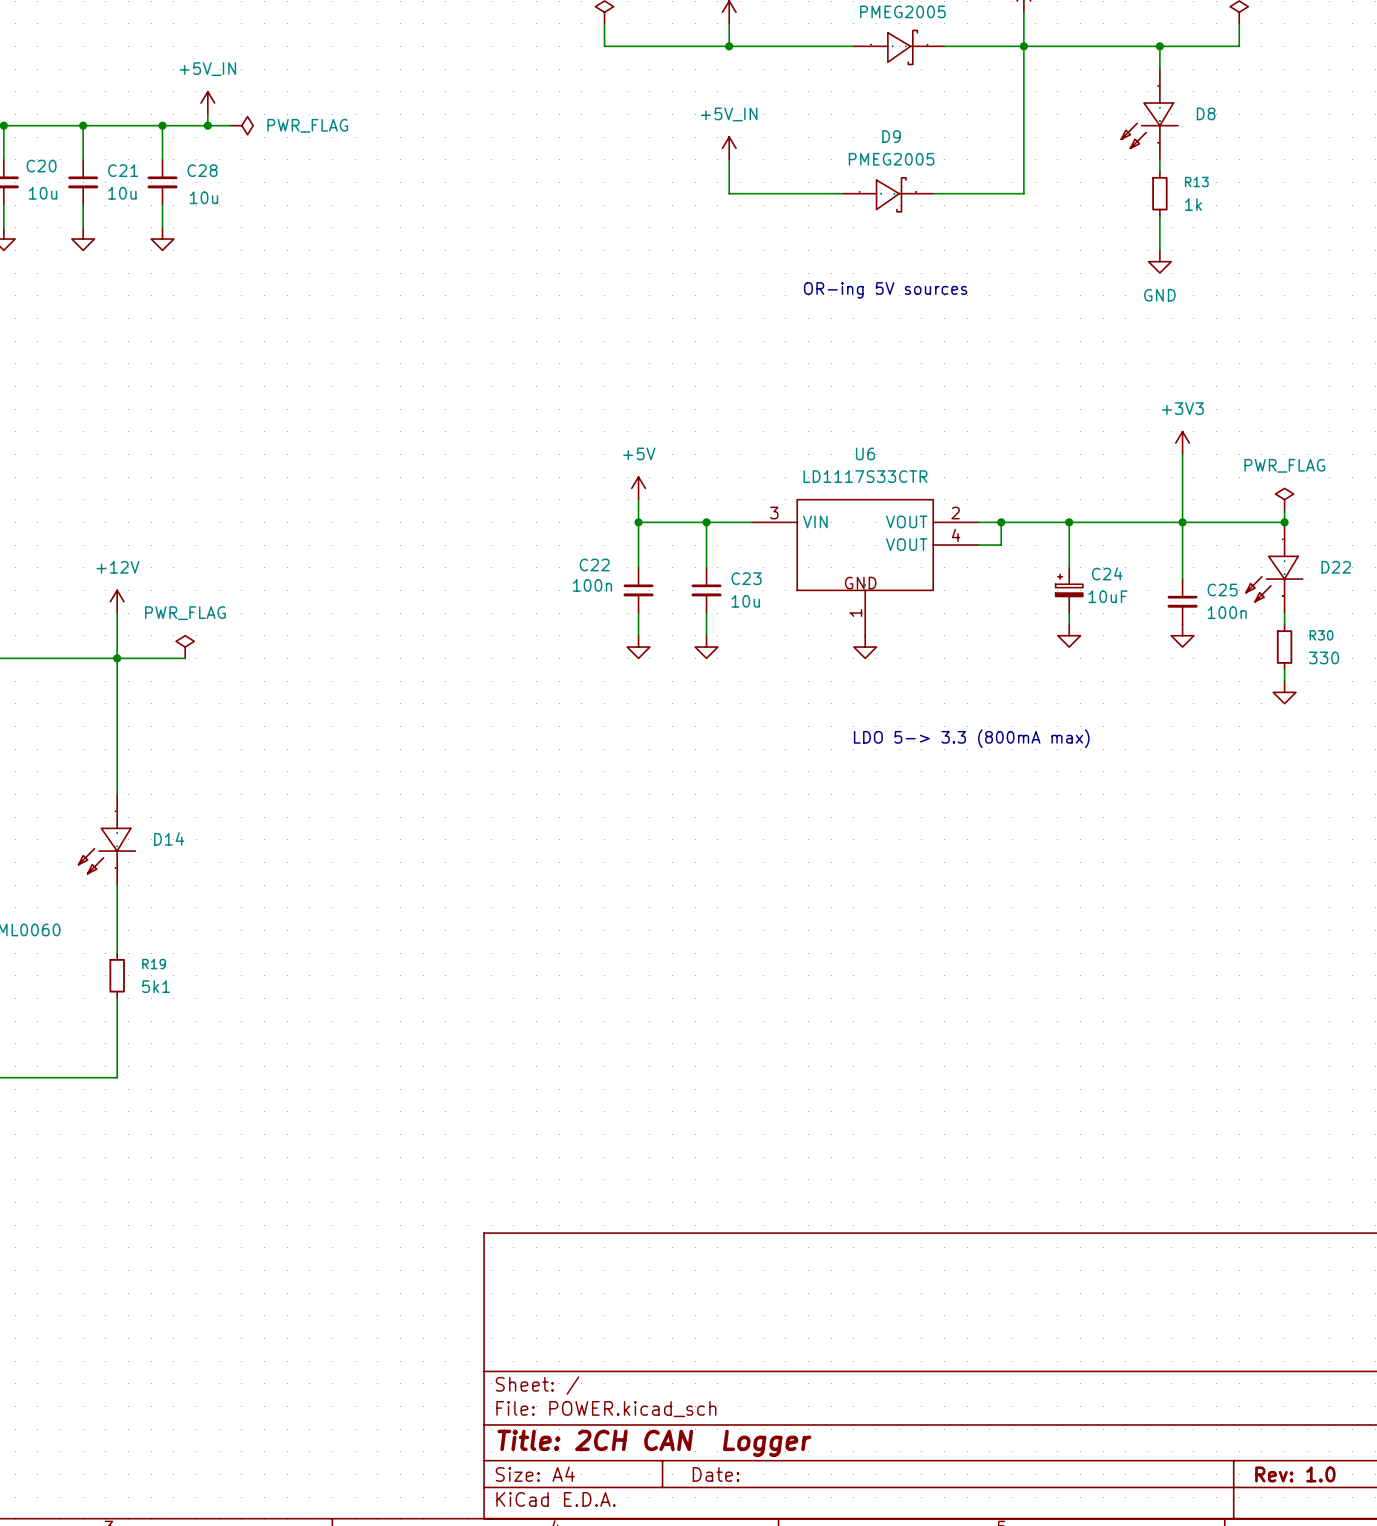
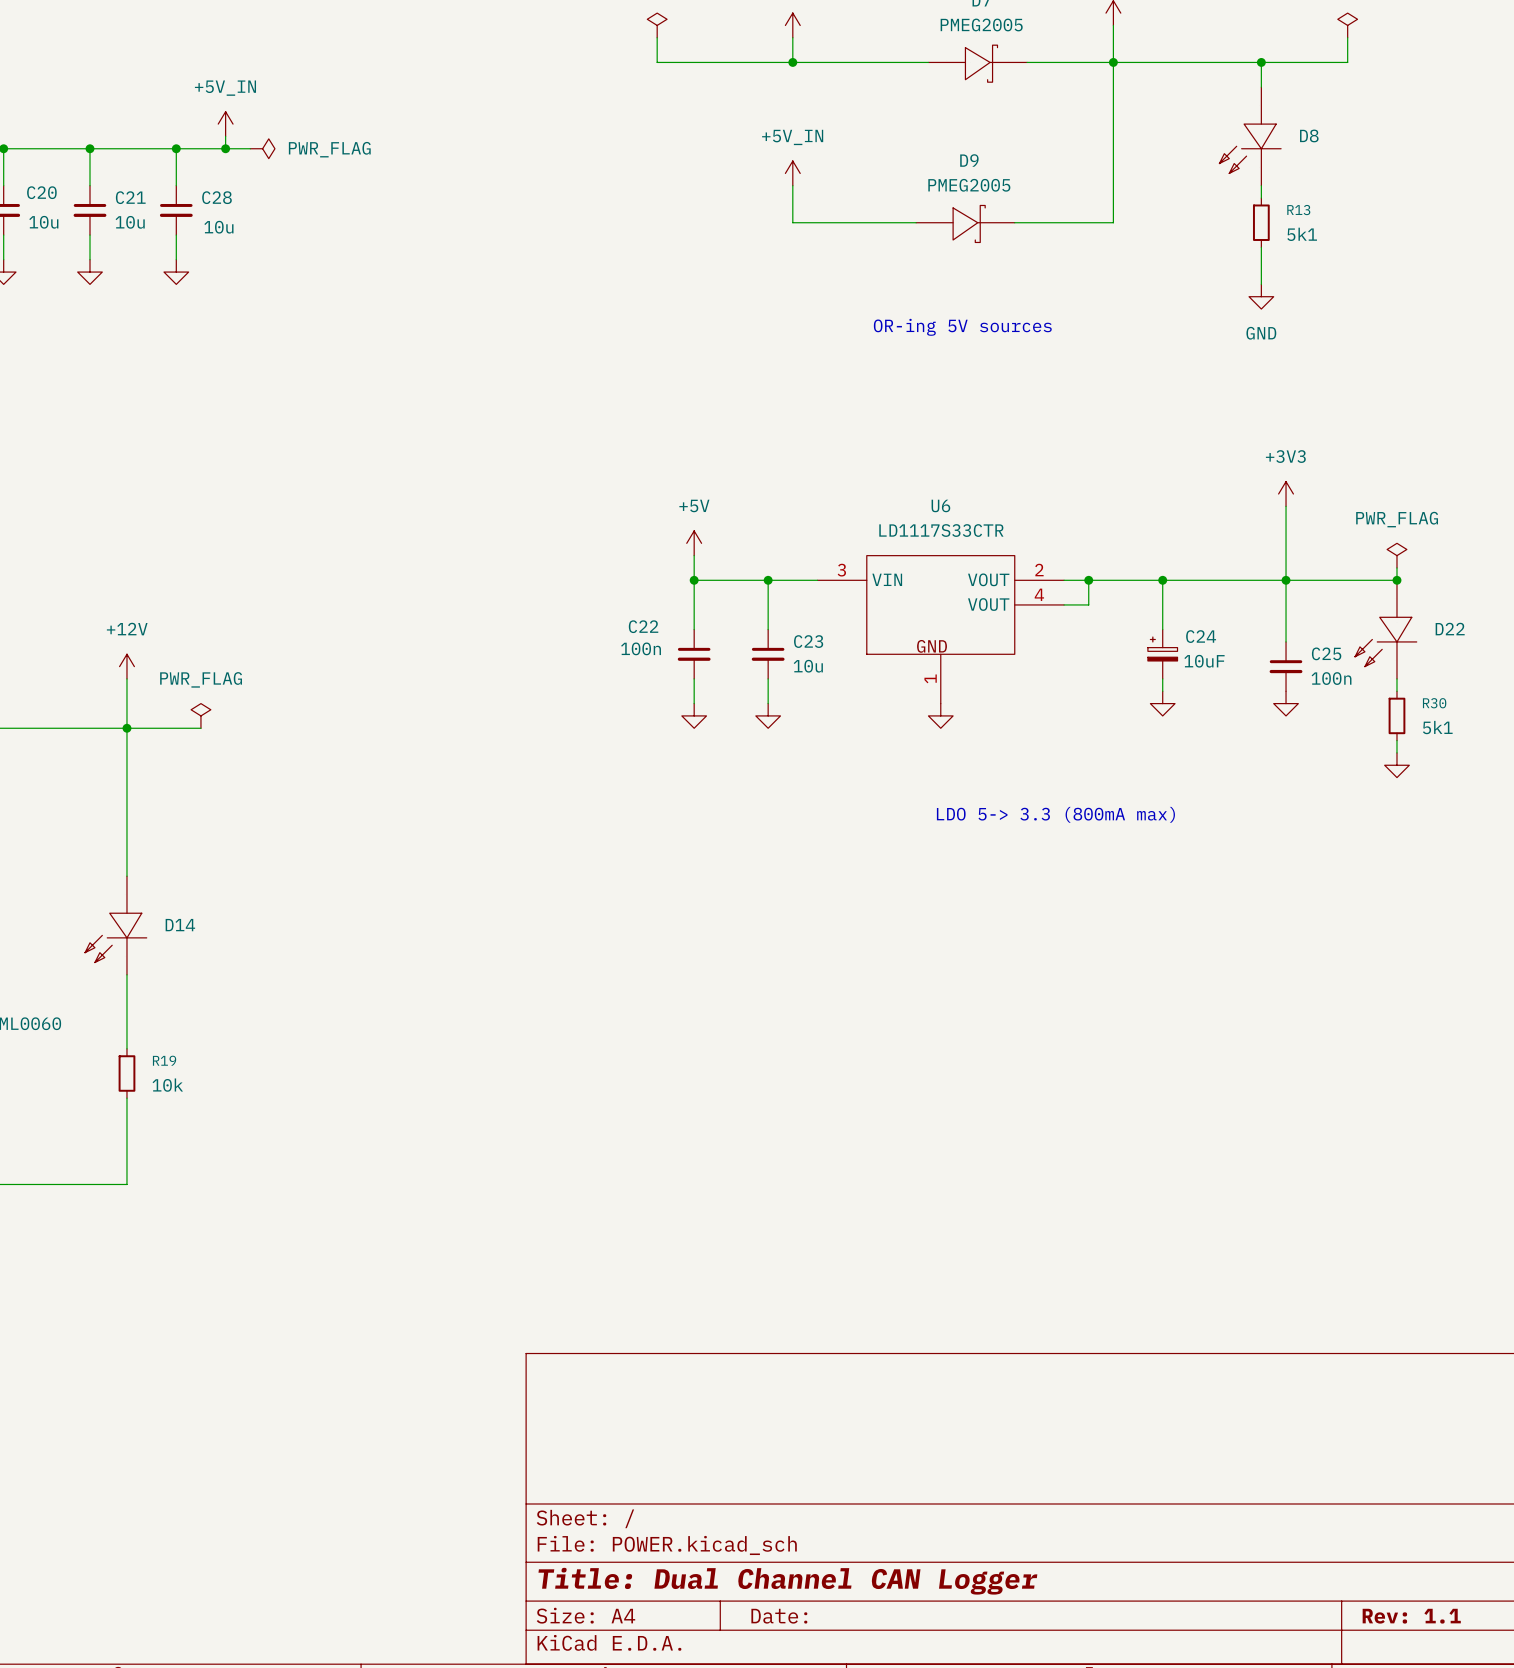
R13 value: 1k (1193, 204) -> 5k1 (1302, 234)
R30 value: 330 (1324, 657) -> 5k1 (1437, 727)
R19 value: 5k1 (156, 986) -> 10k (167, 1085)
title block: Title: 2CH CAN Logger (654, 1443) -> Title: Dual Channel CAN Logger (787, 1581)
title block: Rev: 1.0 (1295, 1474) -> Rev: 1.1 (1411, 1616)

